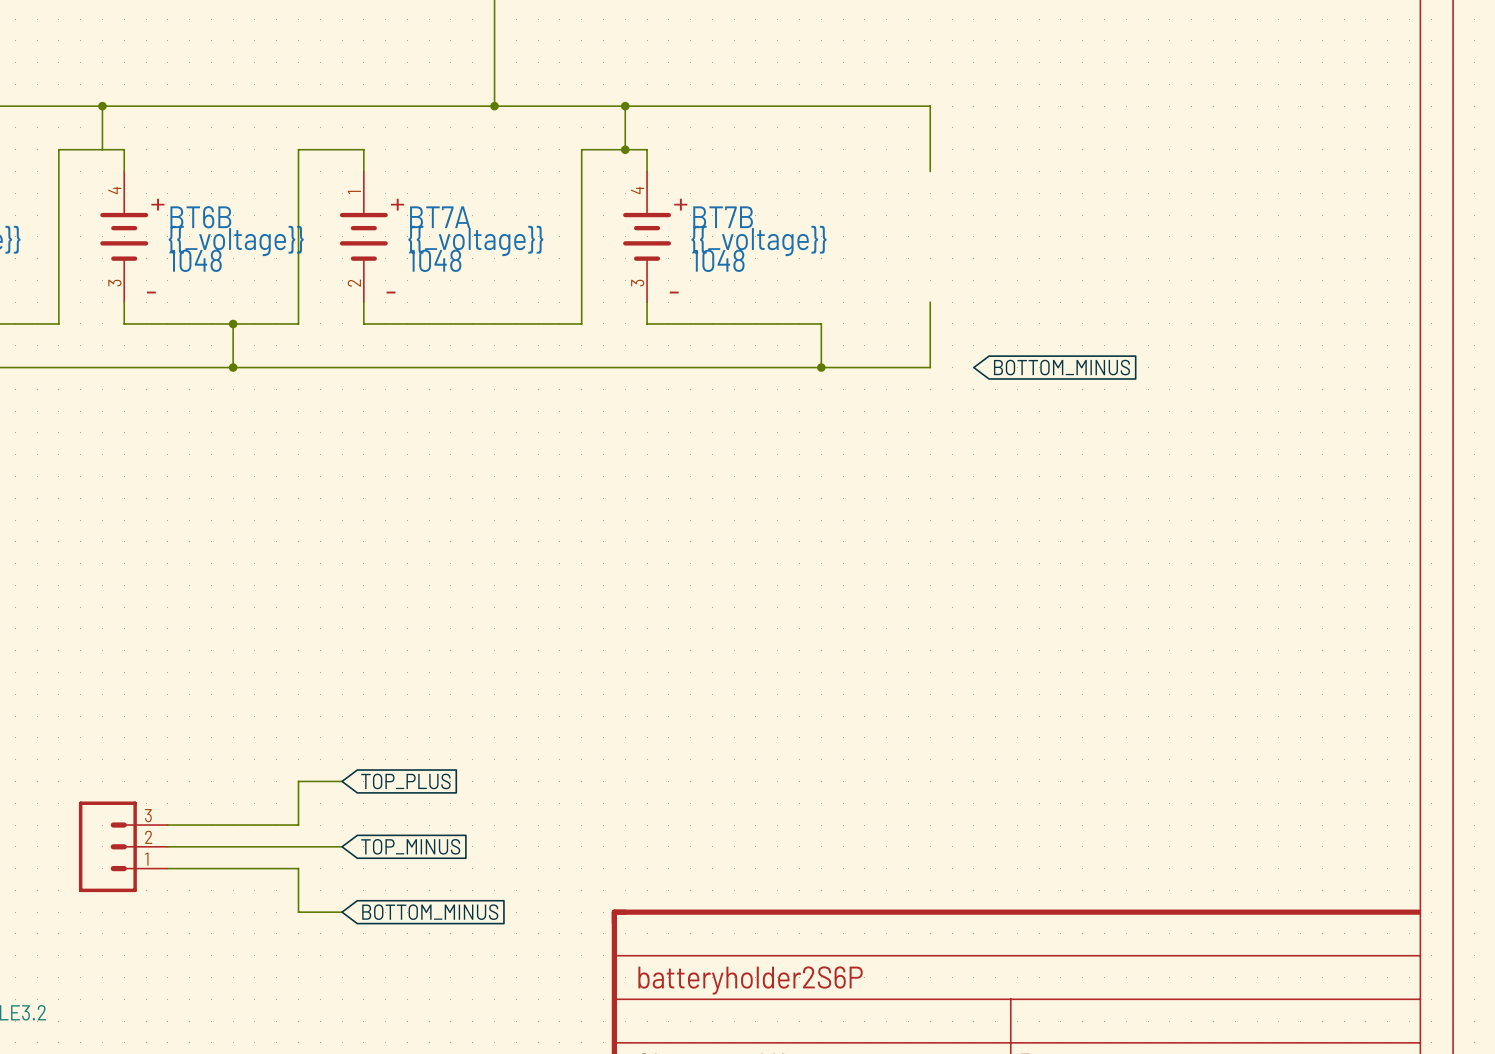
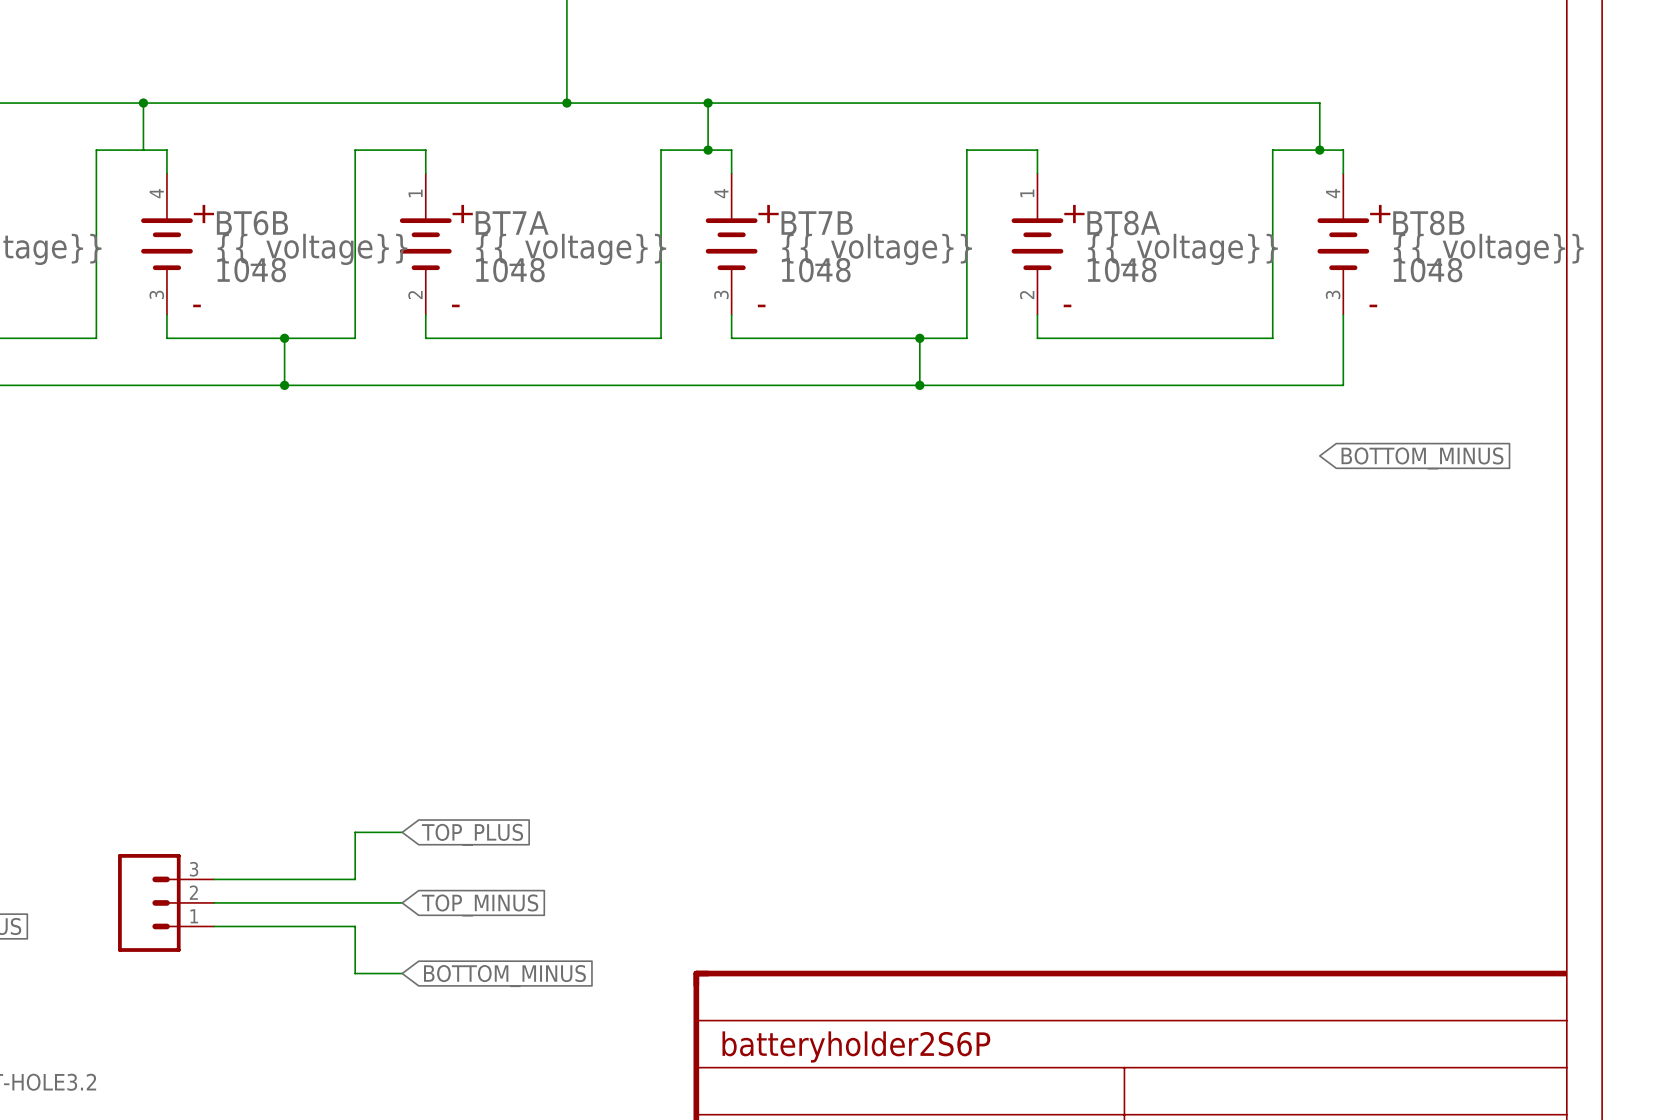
wire: (930, 106) (930, 149) -> (919, 338) (966, 338) (966, 150) (1037, 150)
wire: none -> (1037, 103) (1319, 103) (1319, 150)
junction: none -> (1319, 150)
wire: none -> (1343, 173) (1343, 150) (1272, 150) (1272, 338) (1037, 338)
BT8A: none -> (1037, 244)
BT8B: none -> (1343, 244)
junction: none -> (919, 338)
wire: (930, 323) (930, 367) -> (1343, 314) (1343, 385) (1037, 385)
global label: BOTTOM_MINUS (1062, 367) -> none
global label: none -> BOTTOM_MINUS (1422, 458)

